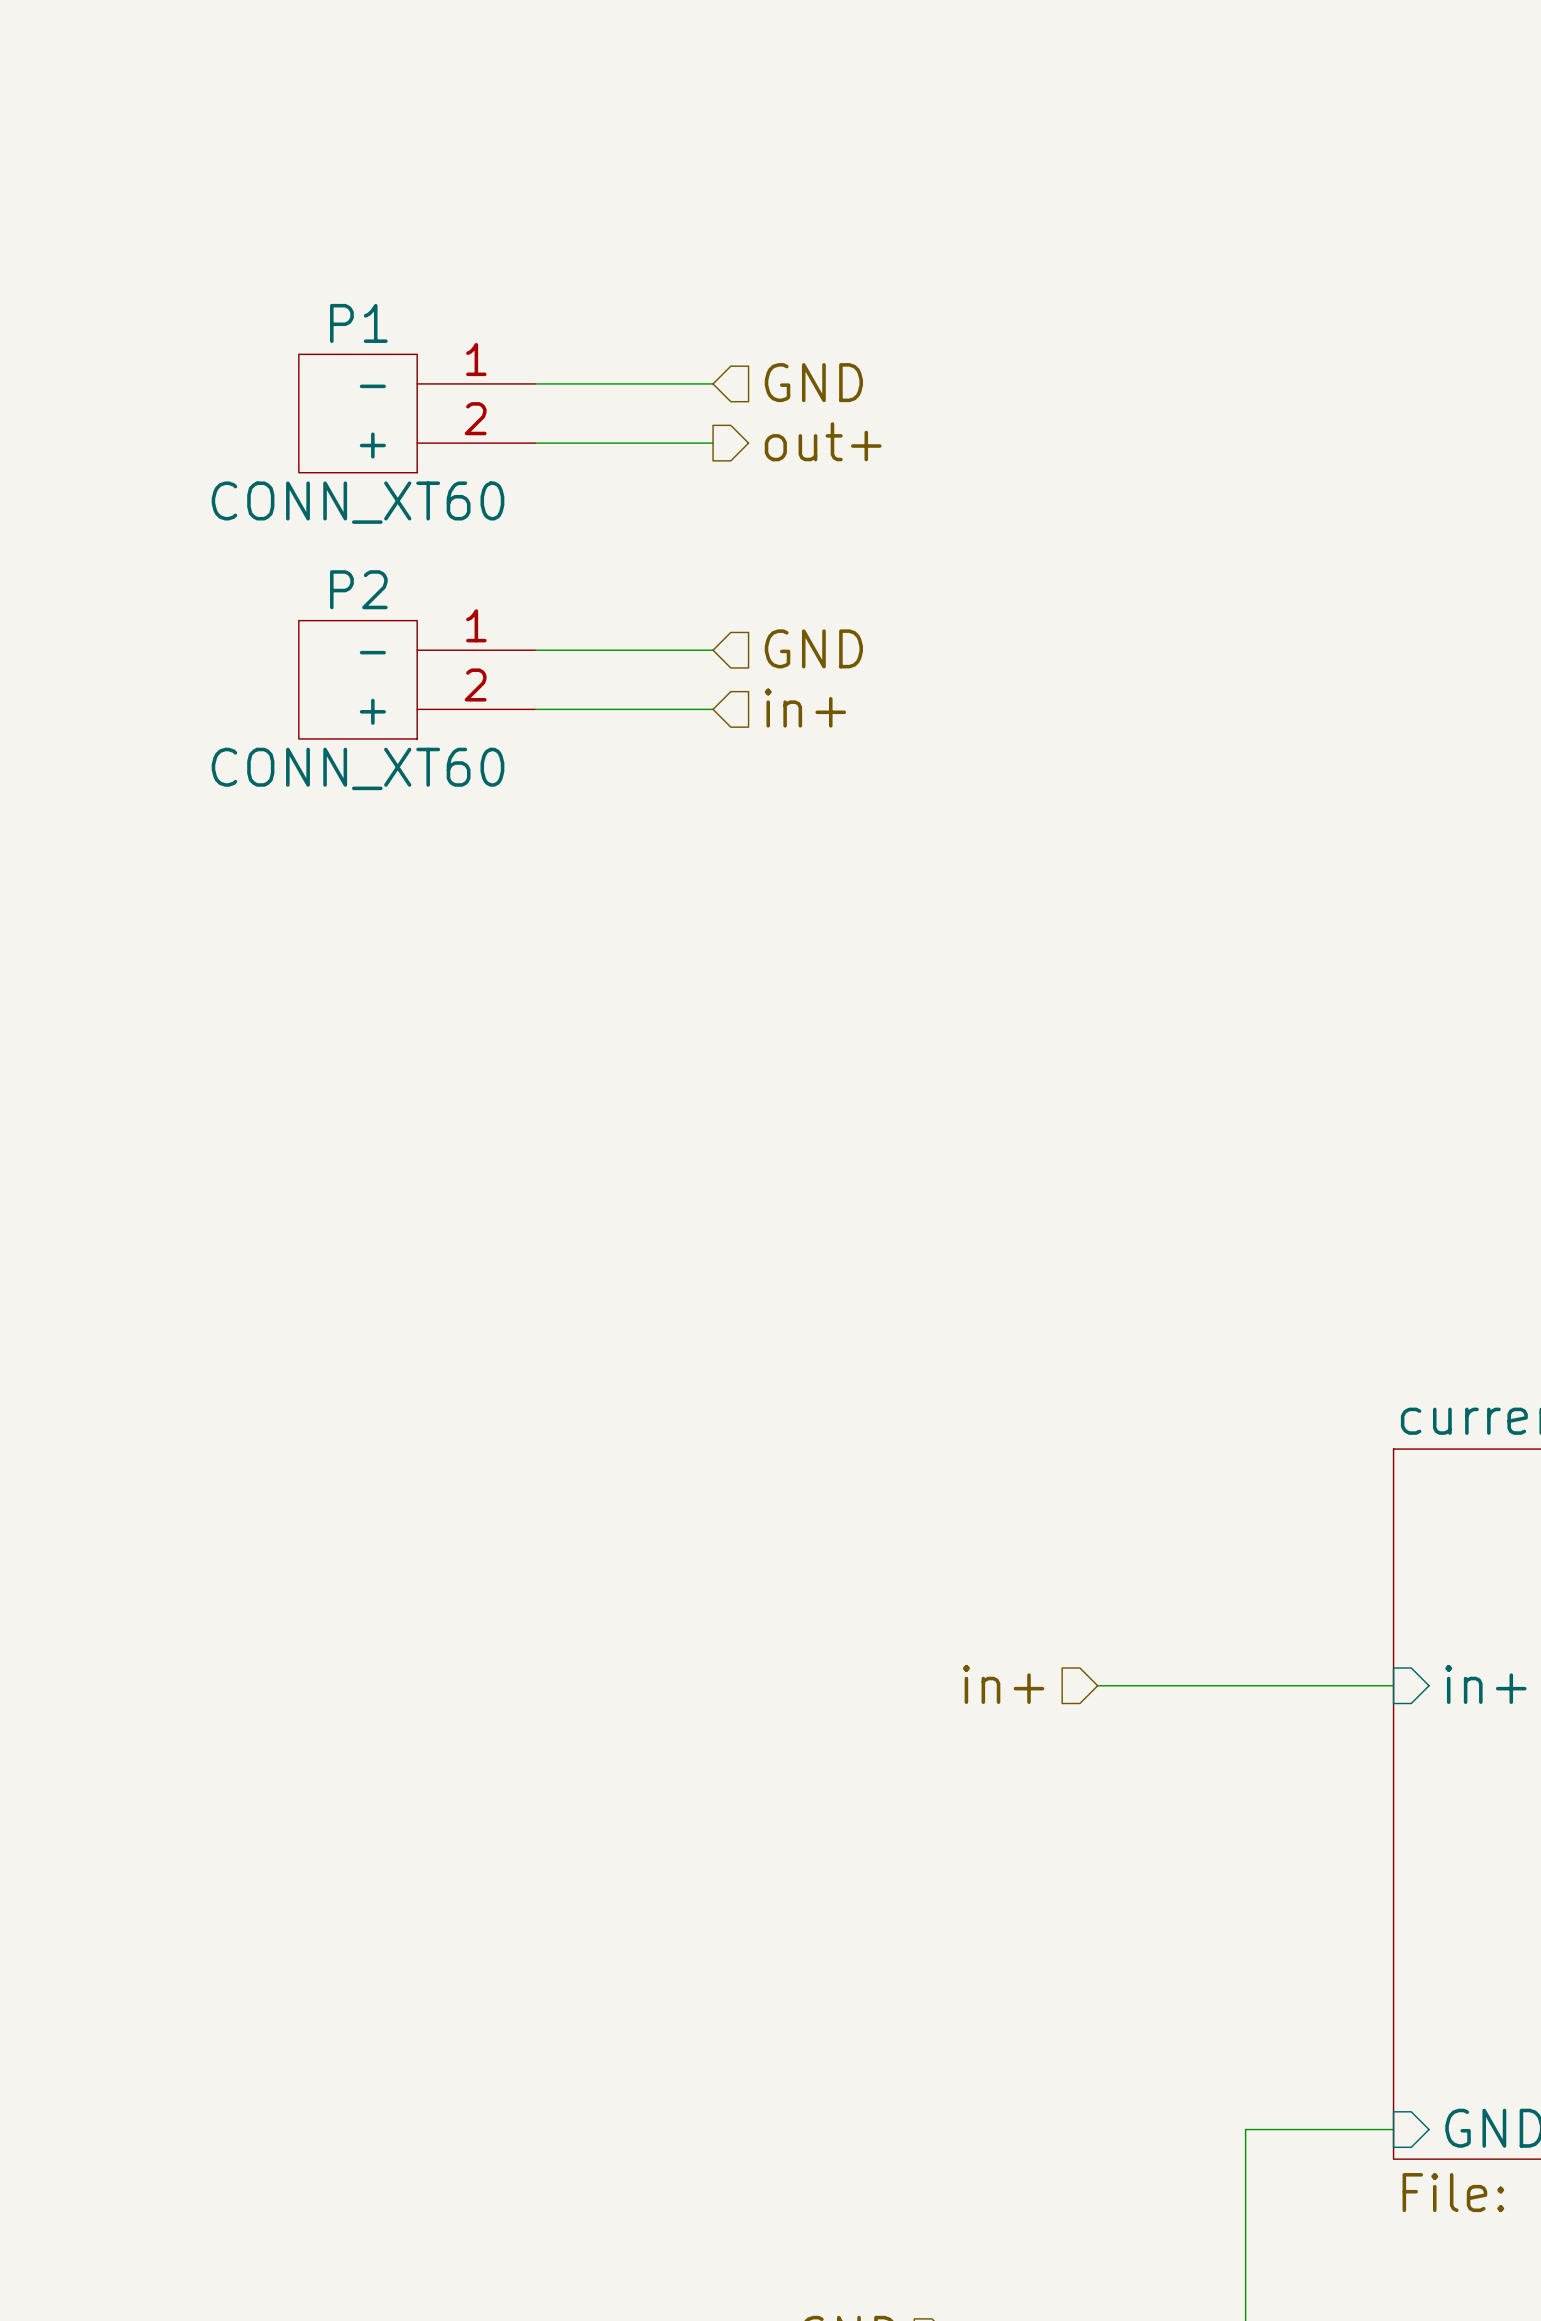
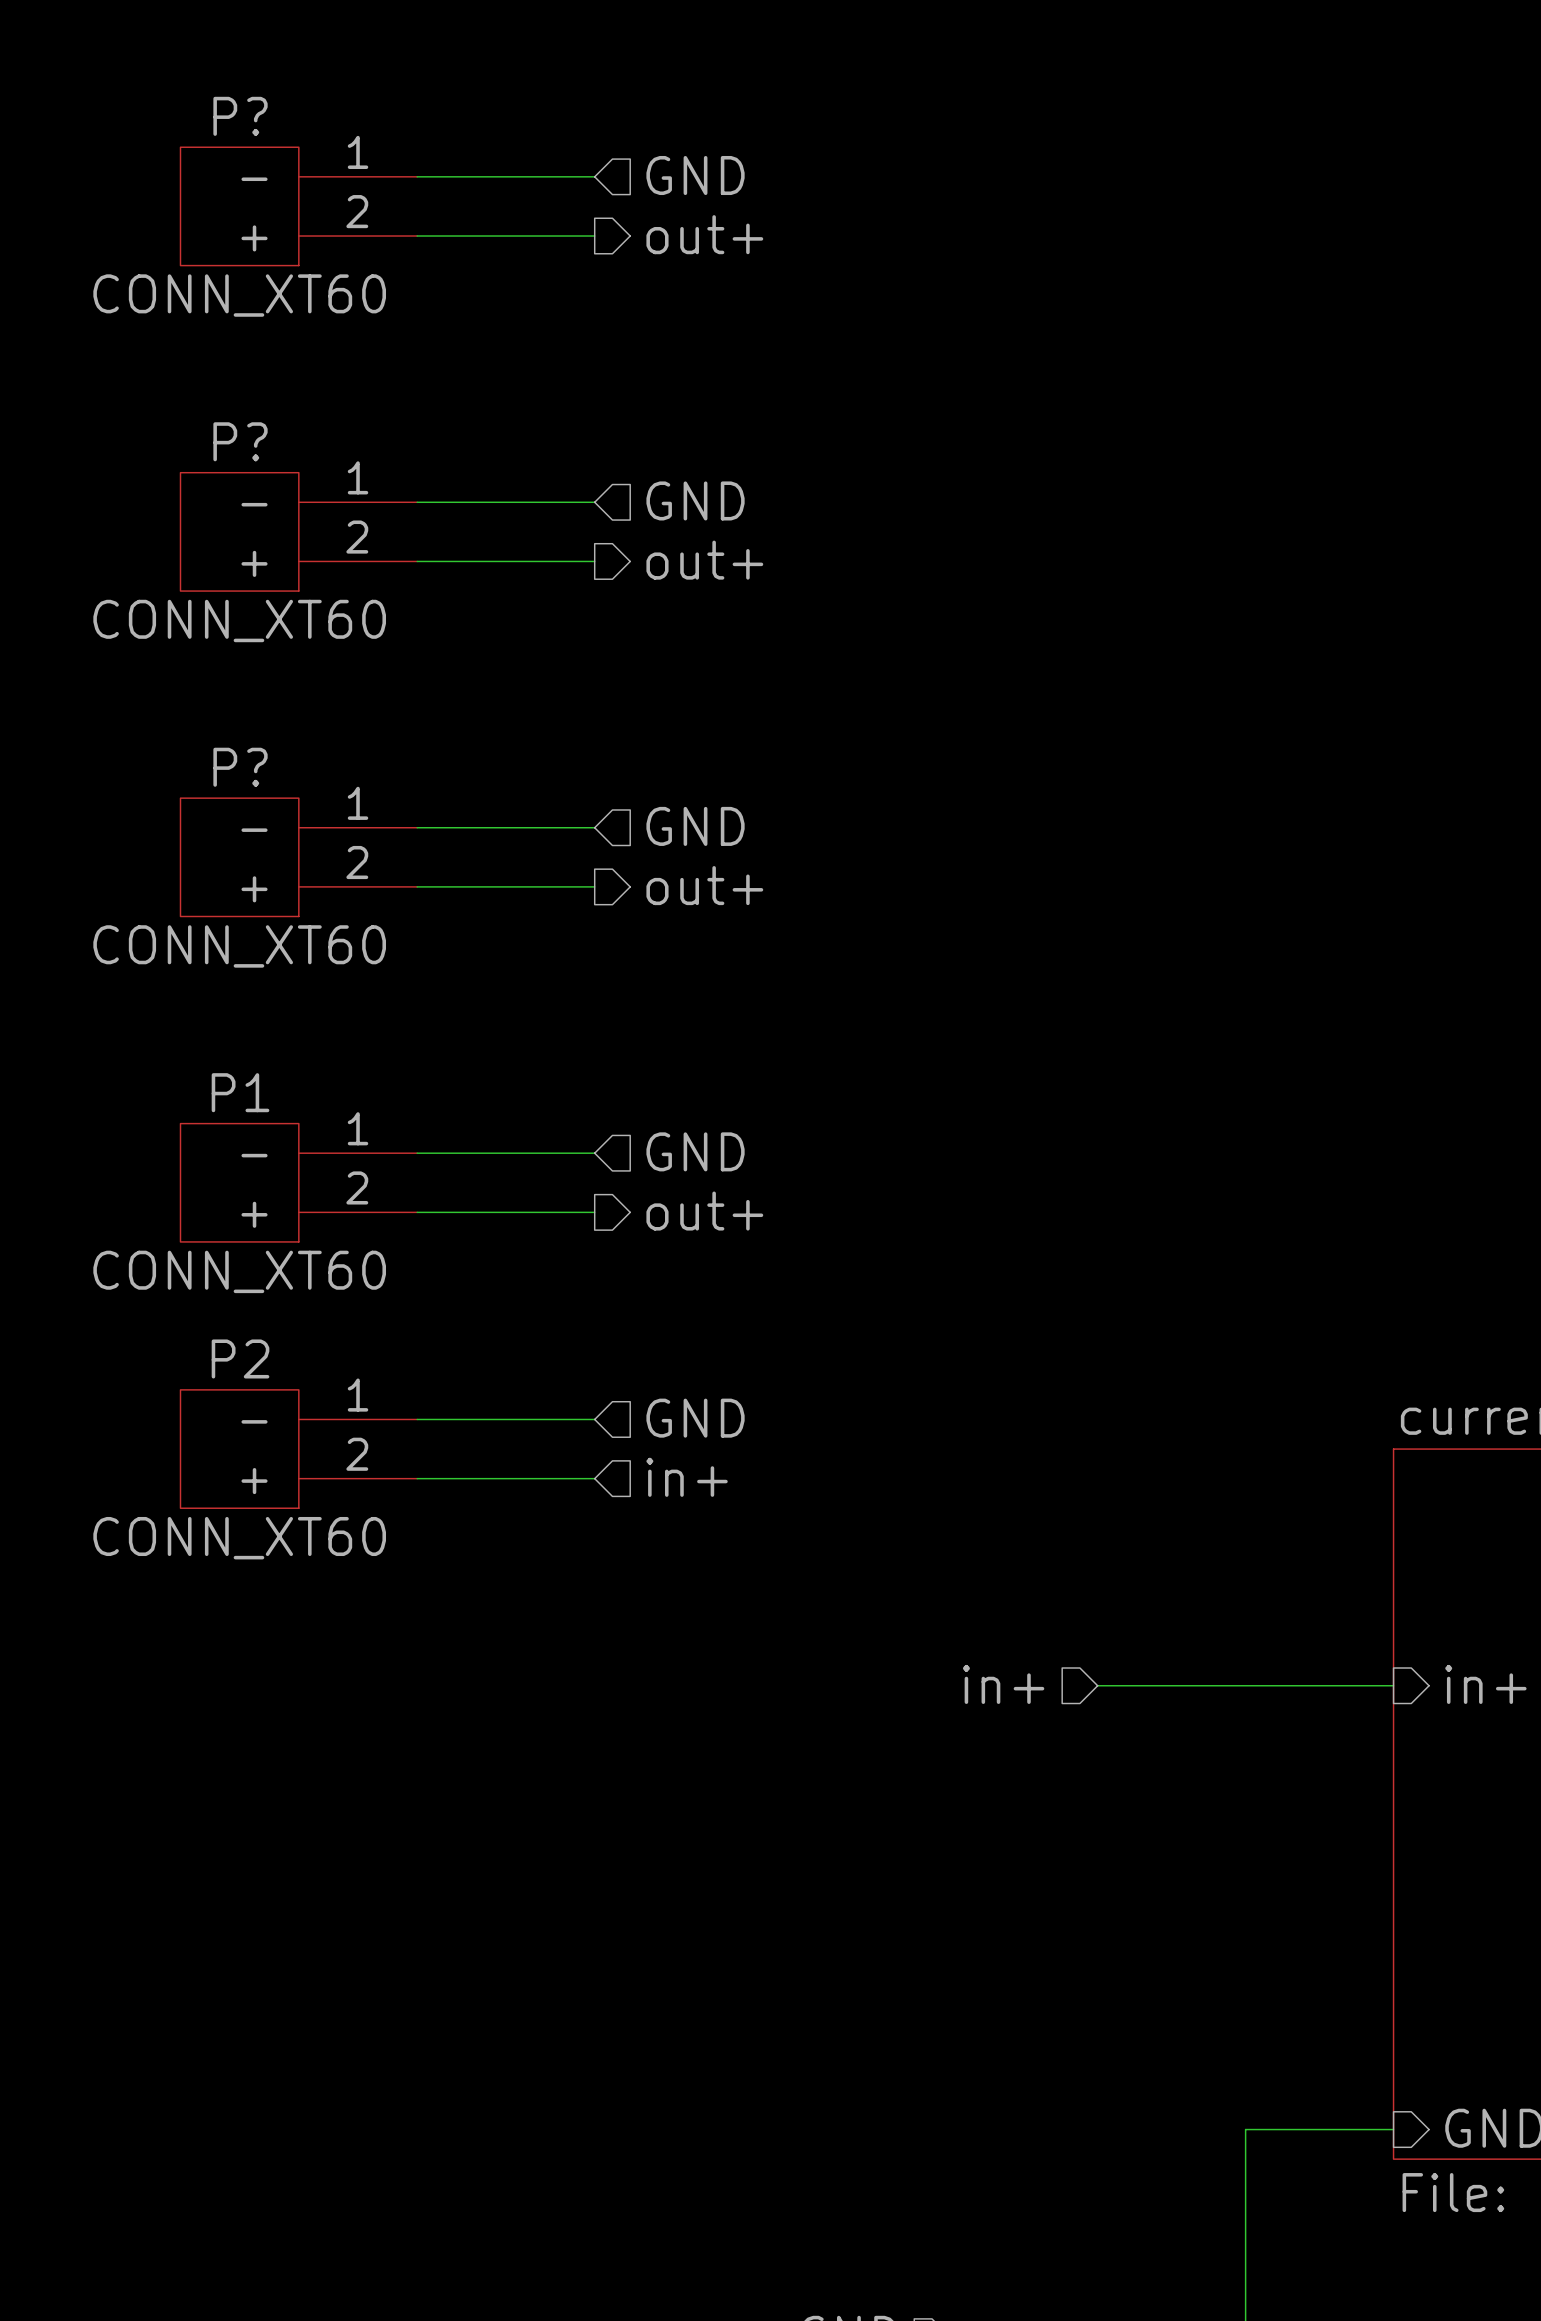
hierarchical label: none -> GND (695, 175)
wire: none -> (417, 176) (594, 176)
P?: none -> CONN_XT60 (298, 206)
hierarchical label: none -> out+ (704, 234)
wire: none -> (417, 236) (594, 236)
hierarchical label: GND (813, 382) -> none
wire: (535, 383) (713, 383) -> (417, 502) (594, 502)
P1 position: (417, 413) -> (298, 1182)
hierarchical label: out+ (823, 441) -> none
wire: (535, 443) (713, 443) -> (417, 561) (594, 561)
hierarchical label: none -> GND (695, 500)
P?: none -> CONN_XT60 (298, 531)
hierarchical label: none -> out+ (704, 560)
hierarchical label: GND (813, 648) -> none
wire: (535, 650) (713, 650) -> (417, 1153) (594, 1153)
P2 position: (417, 679) -> (298, 1449)
hierarchical label: in+ (805, 708) -> none
wire: (535, 709) (713, 709) -> (417, 827) (594, 827)
hierarchical label: none -> GND (695, 826)
P?: none -> CONN_XT60 (298, 857)
hierarchical label: none -> out+ (704, 885)
wire: none -> (417, 886) (594, 886)
hierarchical label: none -> GND (695, 1151)
hierarchical label: none -> out+ (704, 1211)
wire: none -> (417, 1212) (594, 1212)
hierarchical label: none -> GND (695, 1418)
wire: none -> (417, 1419) (594, 1419)
hierarchical label: none -> in+ (687, 1477)
wire: none -> (417, 1478) (594, 1478)

